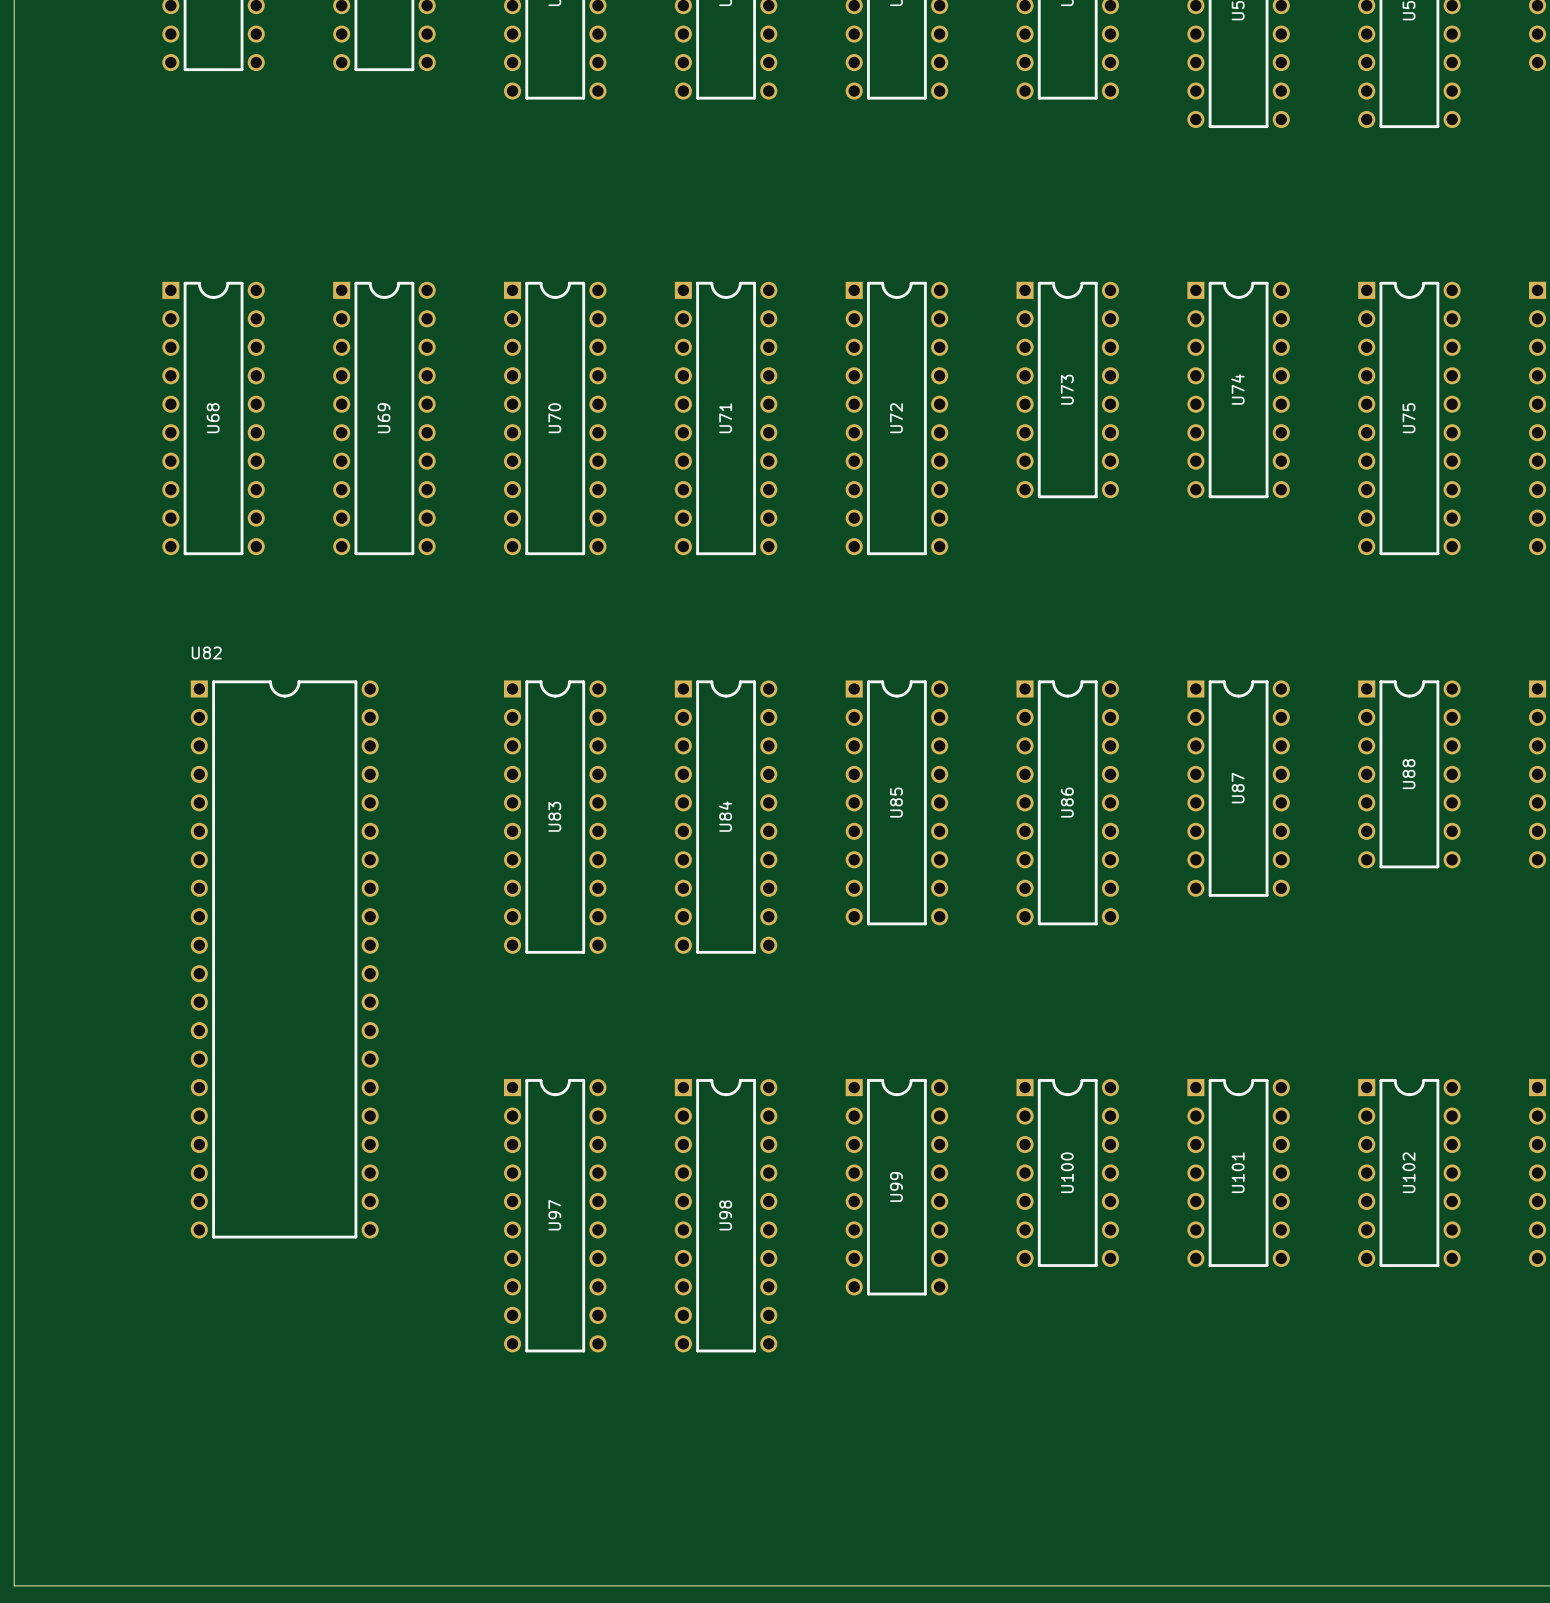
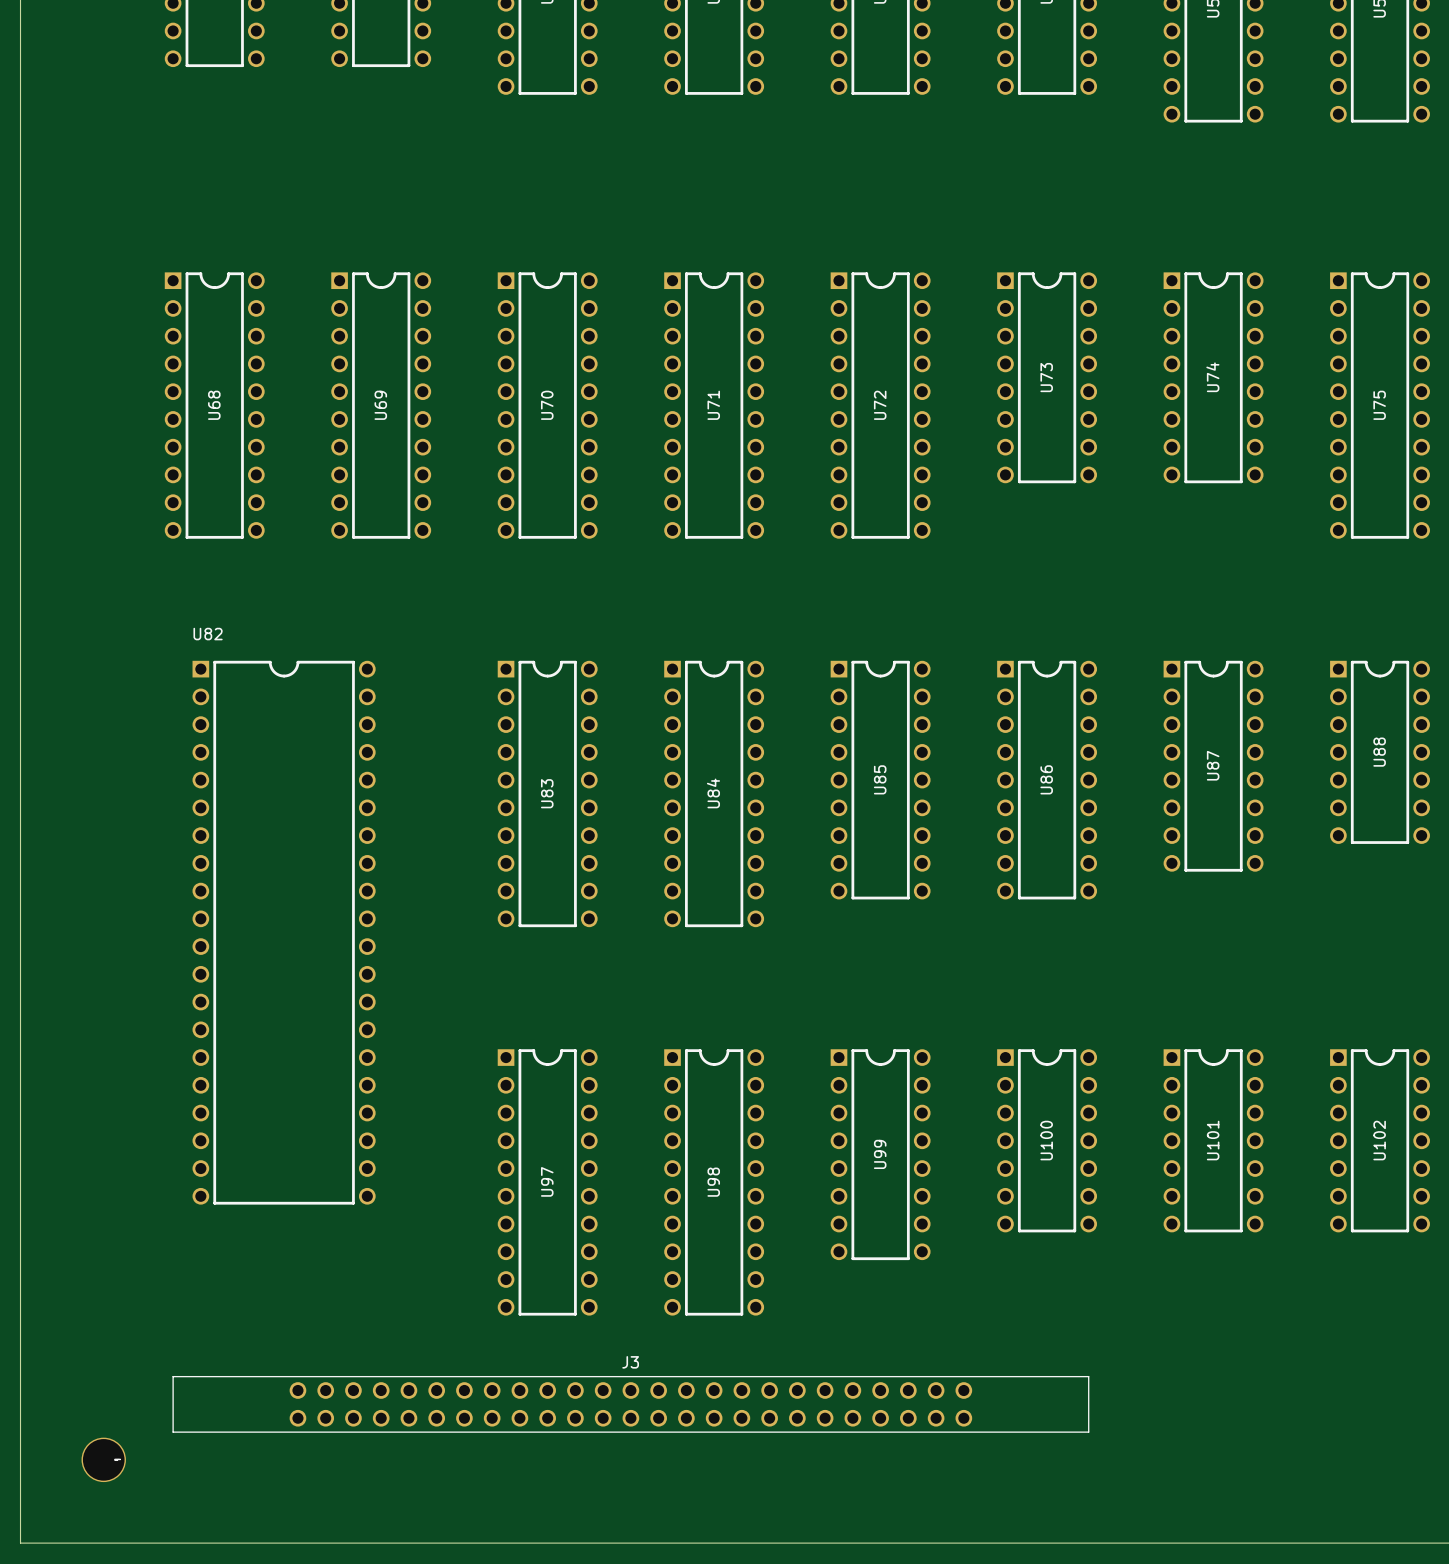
J3: none -> (630, 1404)
part: none -> (103, 1459)

